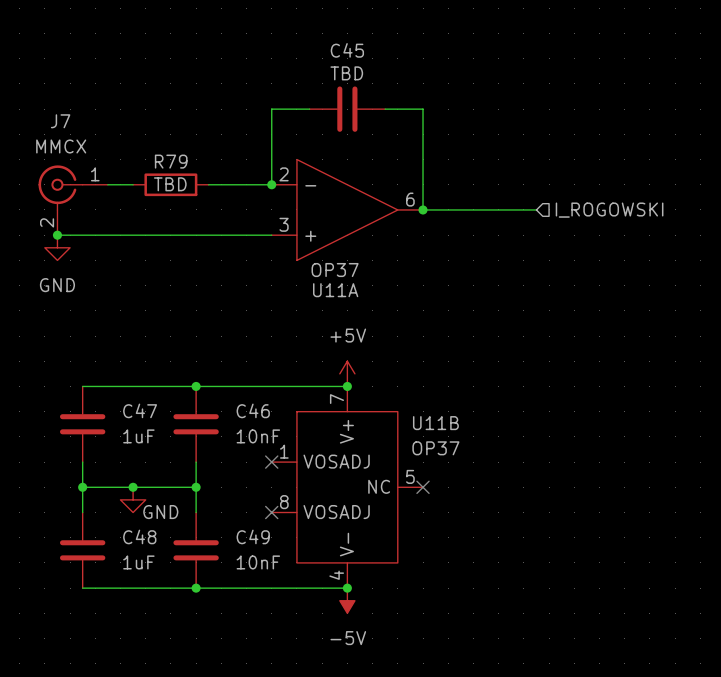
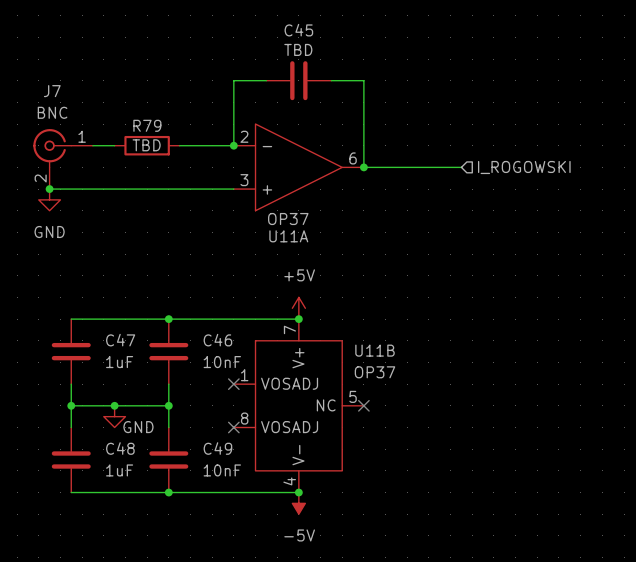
J7 value: MMCX (61, 146) -> BNC (52, 112)

